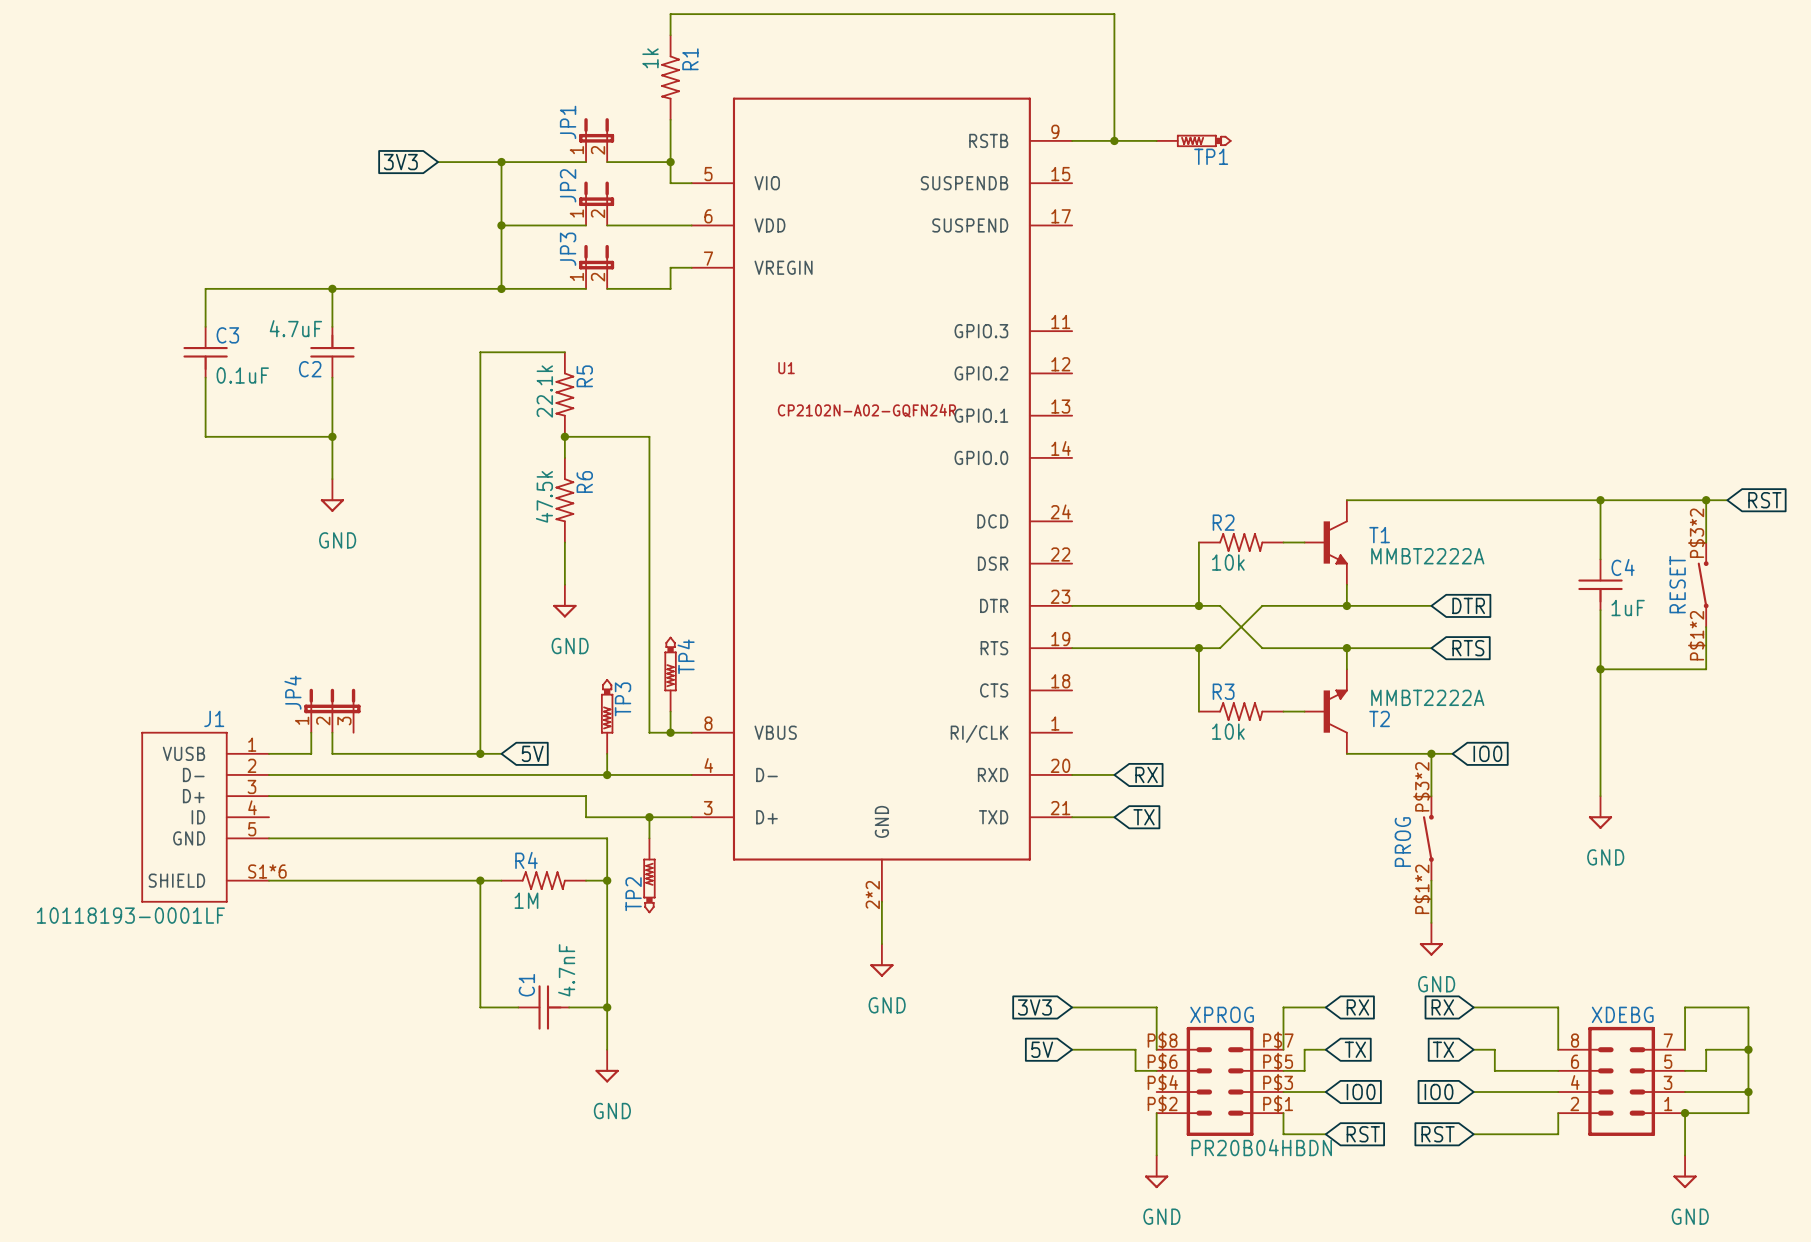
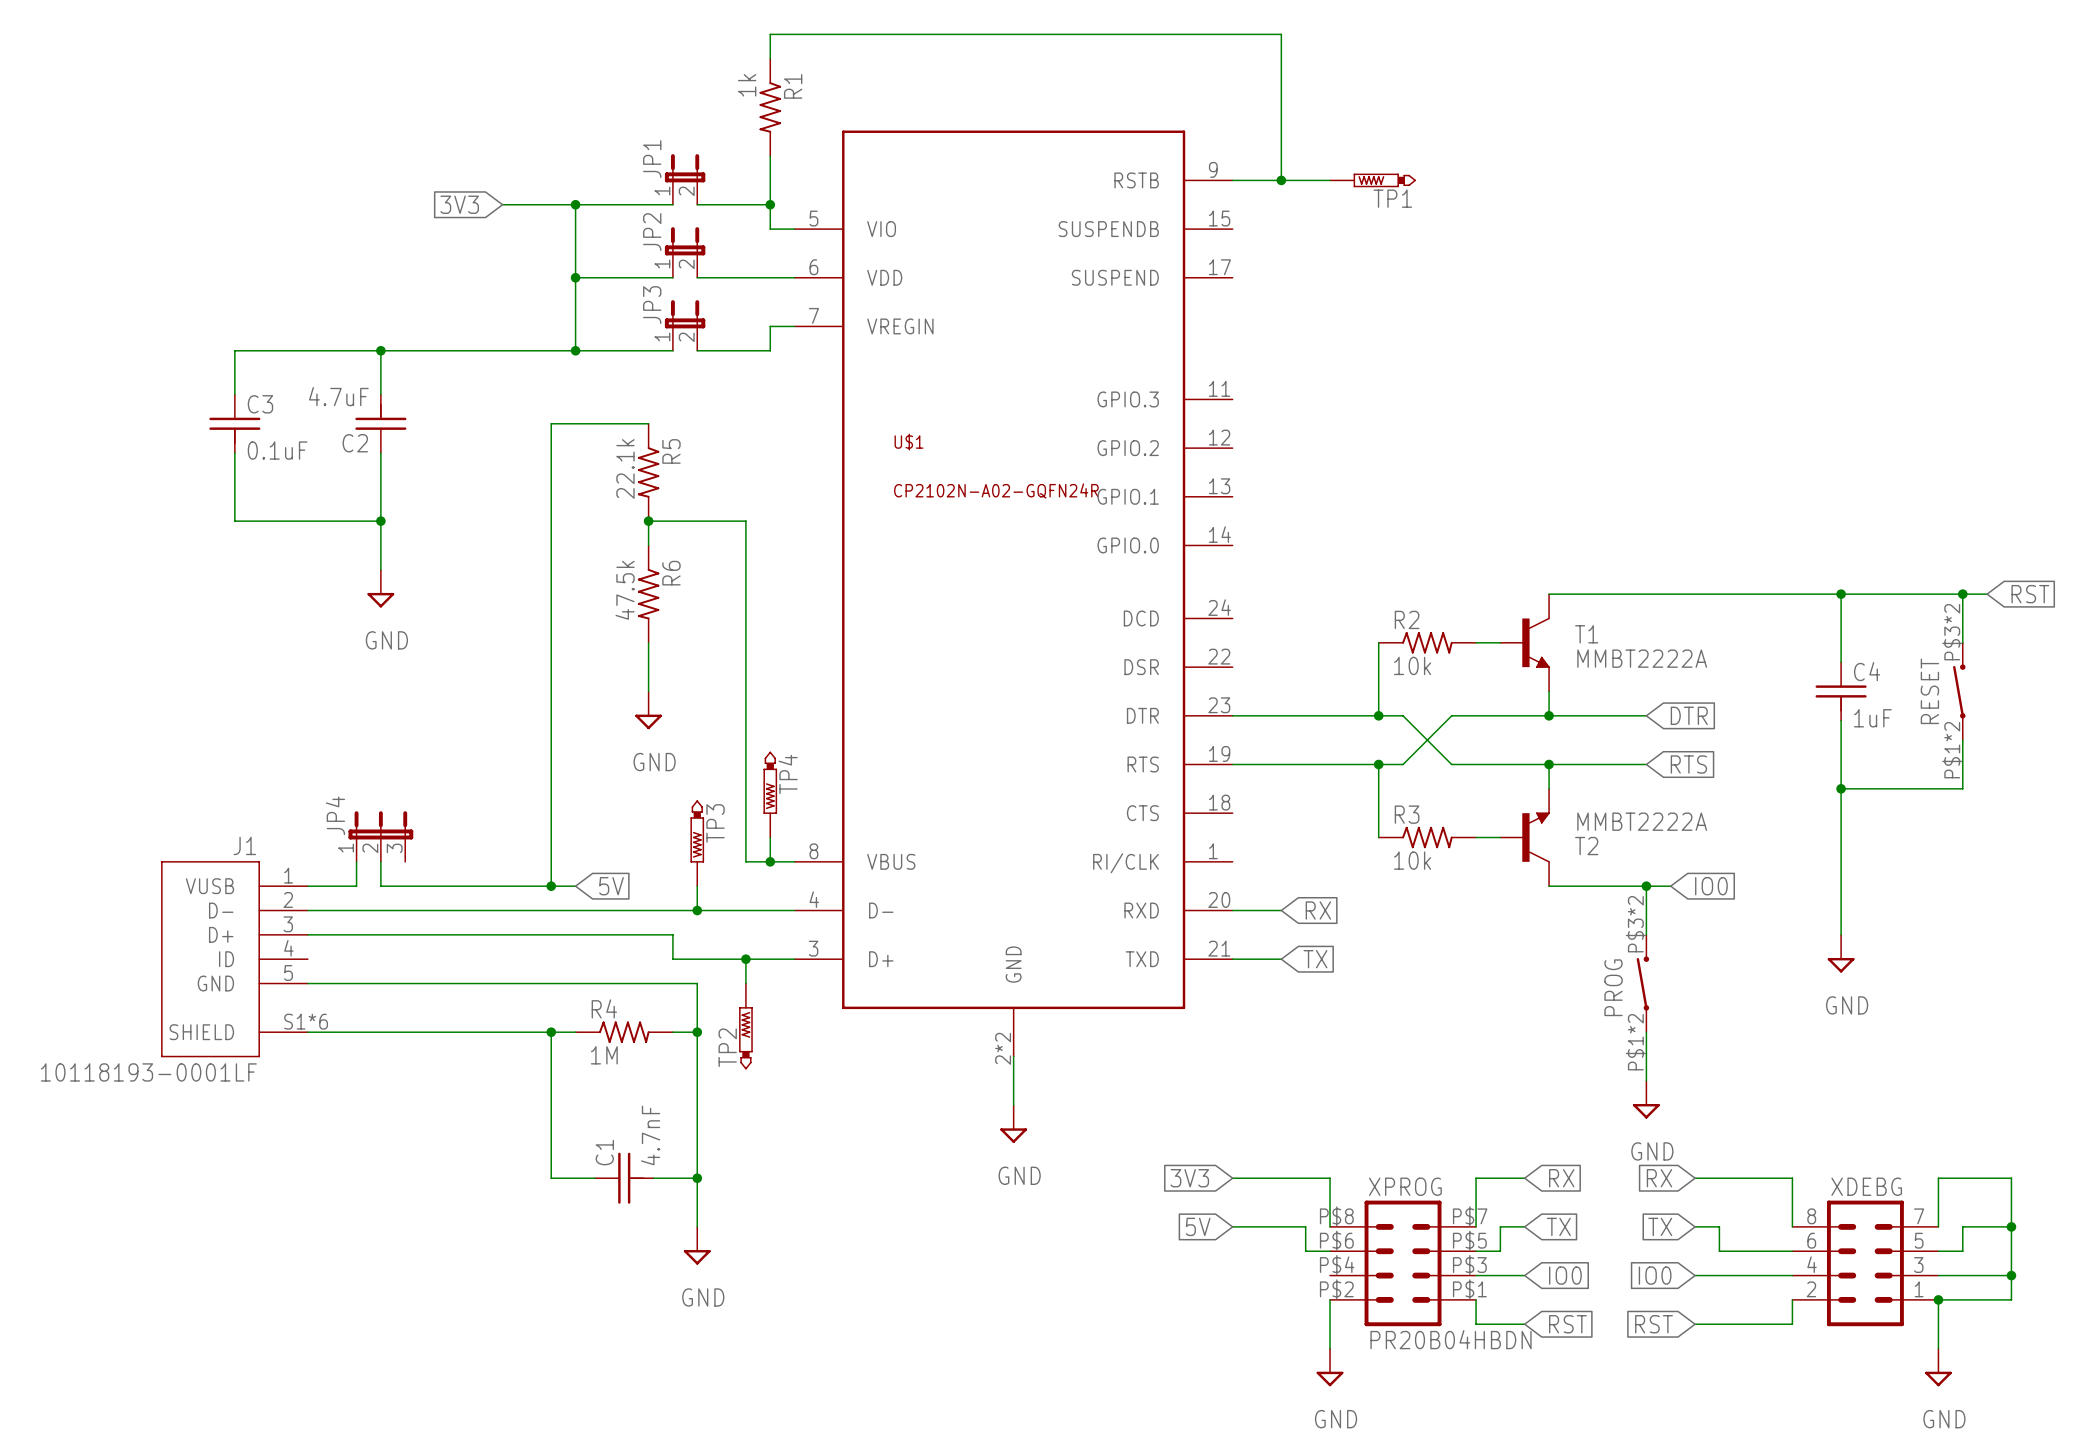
U1 name: U1 (786, 368) -> U$1 (909, 442)

